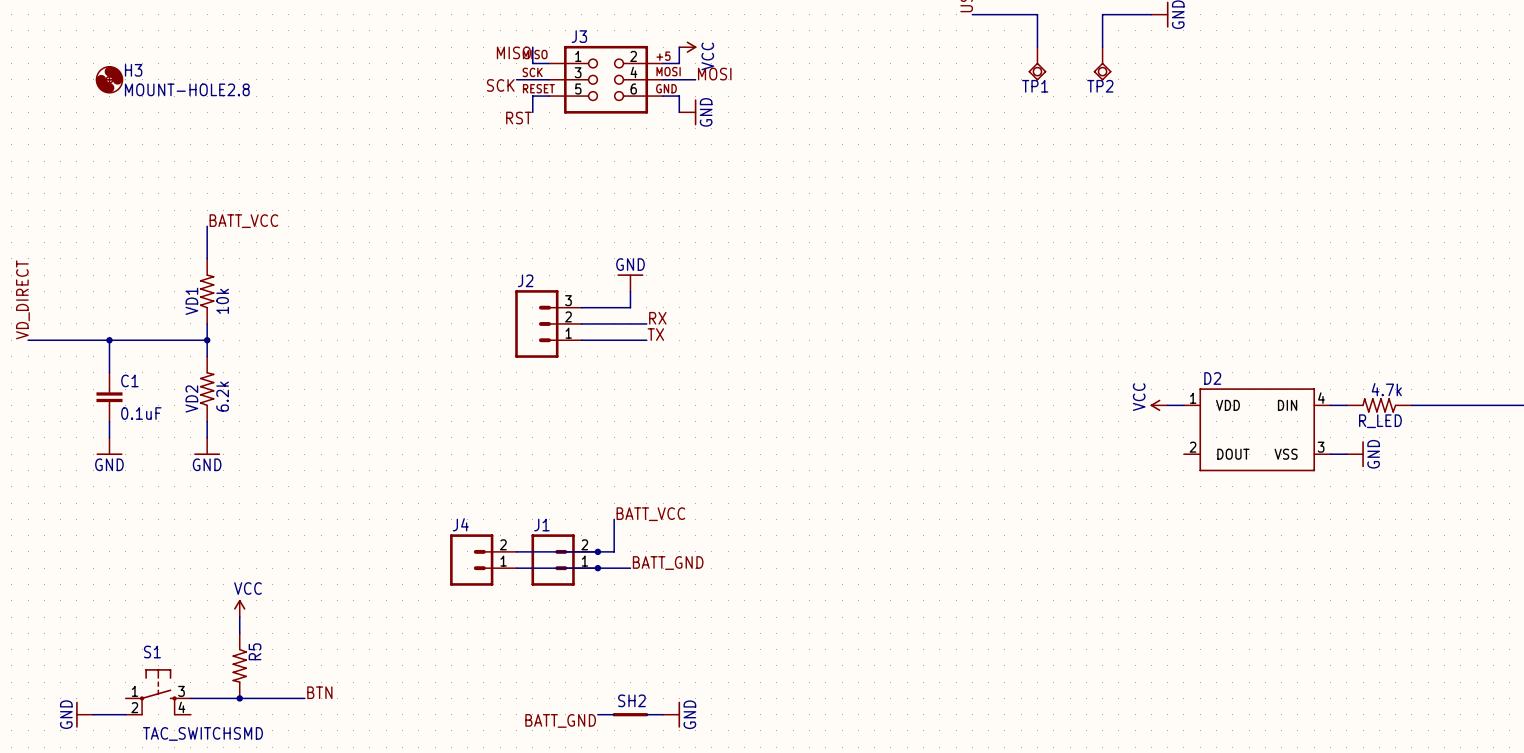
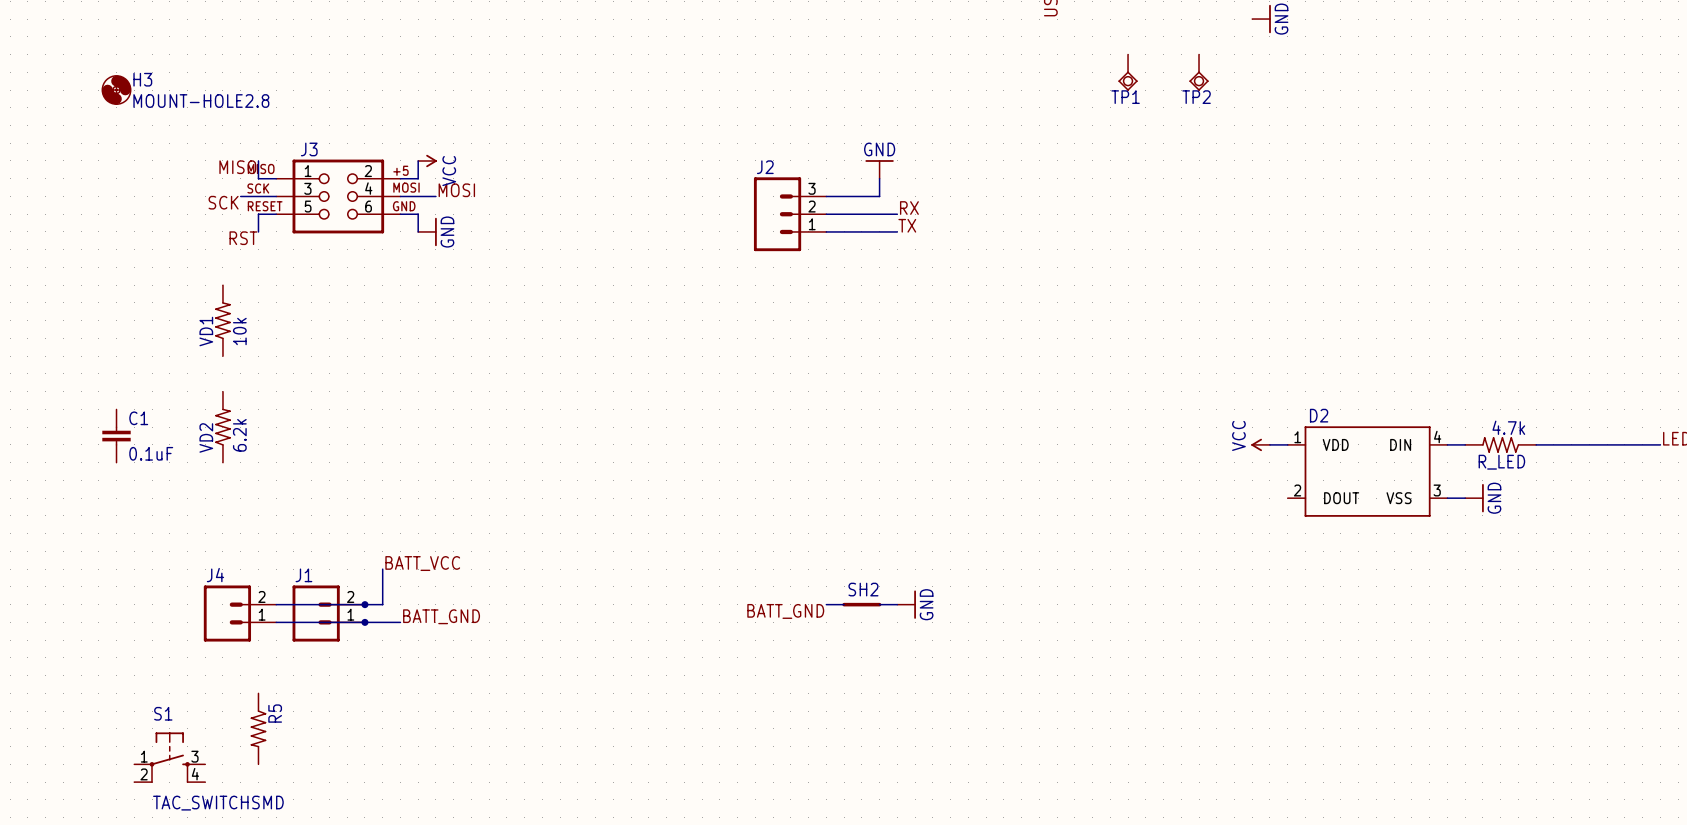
wire: (972, 14) (1037, 14) (1037, 47) -> none
wire: (1151, 14) (1102, 14) (1102, 47) -> none
wire: (532, 47) (532, 63) (549, 63) -> none
wire: (679, 47) (679, 63) (663, 63) -> none
power symbol: VCC (687, 47) -> none
label: MISO (513, 52) -> none
label: MOSI (714, 74) -> none
wire: (516, 79) (549, 79) -> none
J3 position: (606, 79) -> (338, 196)
wire: (663, 79) (695, 79) -> none
label: SCK (500, 85) -> none
wire: (549, 96) (532, 96) (532, 112) -> none
wire: (663, 96) (679, 96) (679, 112) -> none
power symbol: GND (687, 112) -> none
label: RST (518, 118) -> none
wire: none -> (258, 160) (258, 178) (276, 178)
wire: none -> (418, 160) (418, 178) (400, 178)
power symbol: none -> VCC (427, 160)
label: none -> MISO (237, 167)
power symbol: none -> GND (879, 169)
wire: none -> (879, 178) (879, 196) (826, 196)
label: none -> MOSI (456, 190)
wire: none -> (240, 196) (276, 196)
wire: none -> (400, 196) (435, 196)
label: none -> SCK (223, 202)
label: none -> RX (909, 208)
wire: none -> (276, 214) (258, 214) (258, 231)
wire: none -> (400, 214) (418, 214) (418, 231)
wire: none -> (826, 214) (897, 214)
label: none -> TX (907, 225)
power symbol: none -> GND (427, 231)
wire: none -> (826, 231) (897, 231)
label: none -> RST (243, 238)
label: BATT_VCC (243, 221) -> none
wire: (207, 226) (207, 258) -> none
power symbol: GND (630, 282) -> none
wire: (630, 291) (630, 307) (581, 307) -> none
label: VD_DIRECT (22, 299) -> none
label: RX (657, 318) -> none
wire: (207, 323) (207, 356) -> none
J2 position: (548, 323) -> (790, 214)
wire: (581, 323) (646, 323) -> none
label: TX (655, 334) -> none
wire: (28, 340) (207, 340) -> none
wire: (109, 340) (109, 372) -> none
junction: (109, 340) -> none
junction: (207, 340) -> none
wire: (581, 340) (646, 340) -> none
wire: (109, 421) (109, 437) -> none
wire: (207, 421) (207, 437) -> none
power symbol: GND (109, 446) -> none
power symbol: GND (207, 446) -> none
label: none -> BATT_VCC (422, 563)
label: BATT_VCC (650, 514) -> none
wire: none -> (382, 569) (382, 604) (276, 604)
wire: (614, 519) (614, 551) (516, 551) -> none
junction: none -> (364, 604)
junction: (597, 551) -> none
wire: none -> (826, 604) (844, 604)
wire: none -> (879, 604) (897, 604)
power symbol: none -> GND (906, 604)
J4 position: (483, 560) -> (240, 613)
J1 position: (564, 560) -> (328, 613)
label: none -> BATT_GND (441, 616)
label position: BATT_GND (668, 563) -> BATT_GND (785, 611)
junction: none -> (364, 622)
wire: (516, 568) (630, 568) -> none
junction: (597, 568) -> none
power symbol: VCC (239, 608) -> none
wire: (239, 617) (239, 633) -> none
label: BTN (319, 692) -> none
wire: (190, 698) (304, 698) -> (276, 622) (400, 622)
junction: (239, 698) -> none
power symbol: GND (84, 714) -> none
wire: (93, 714) (125, 714) -> none
wire: (597, 714) (614, 714) -> none
SH2 position: (630, 714) -> (861, 604)
wire: (646, 714) (663, 714) -> none
power symbol: GND (671, 714) -> none
label: BATT_GND (560, 720) -> none

